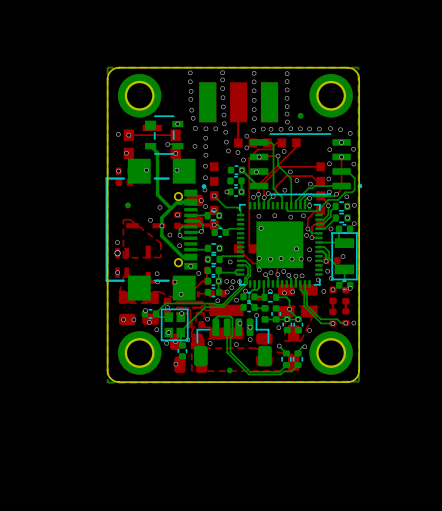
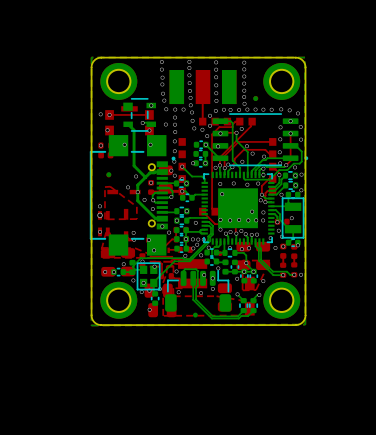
part footprint: [141, 309, 160, 319] -> [129, 259, 136, 276]
part: none -> (118, 272)
bottom track: none -> (132, 272) (123, 272)
via: (149, 322) -> none

